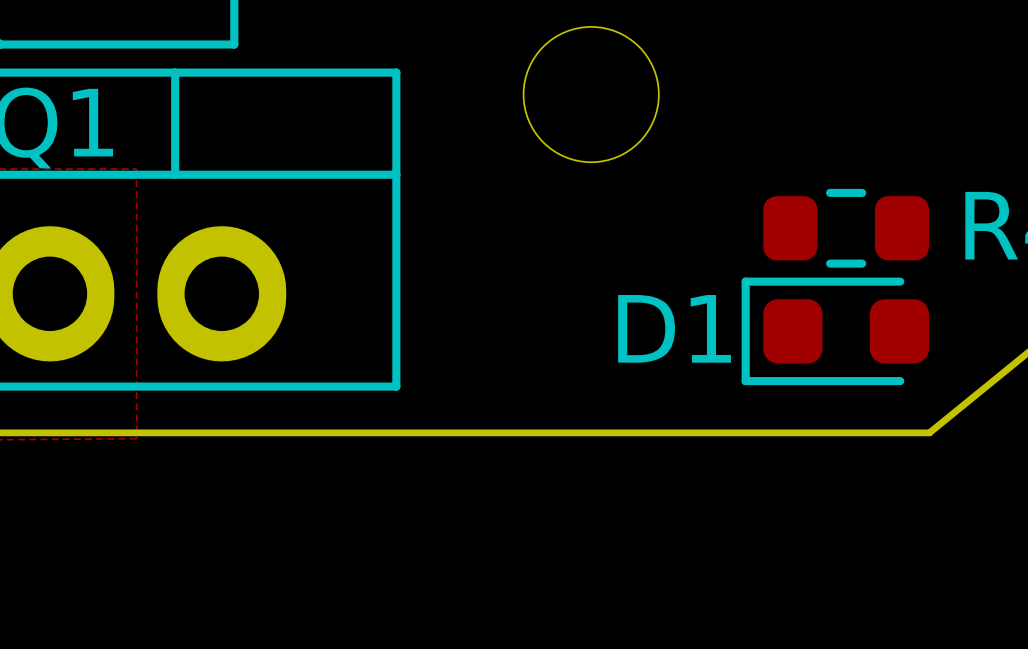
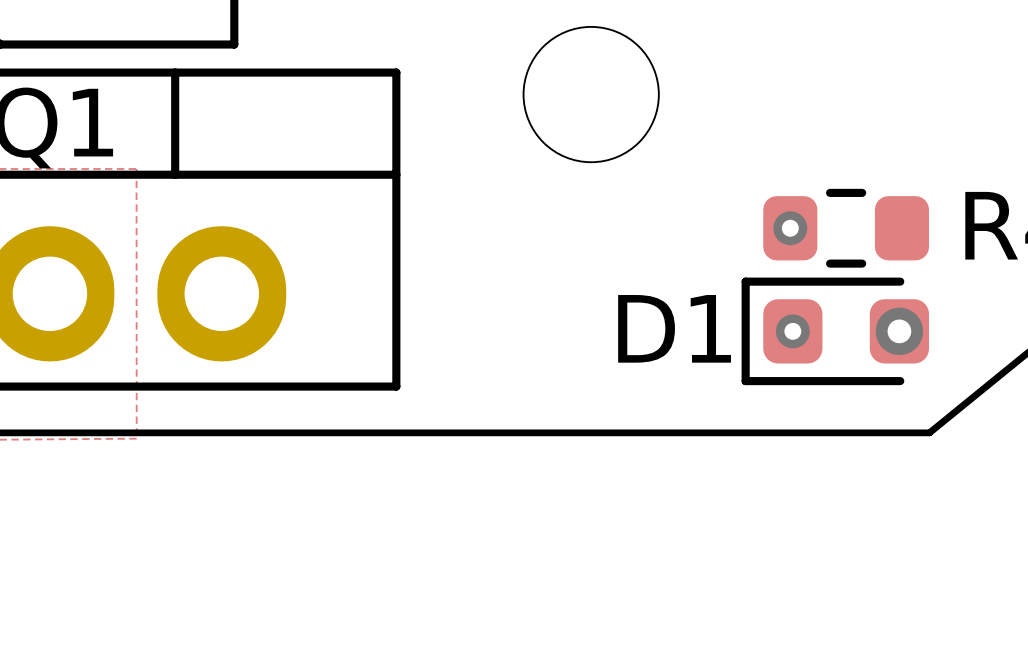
via: none -> (790, 228)
via: none -> (792, 331)
via: none -> (899, 331)

